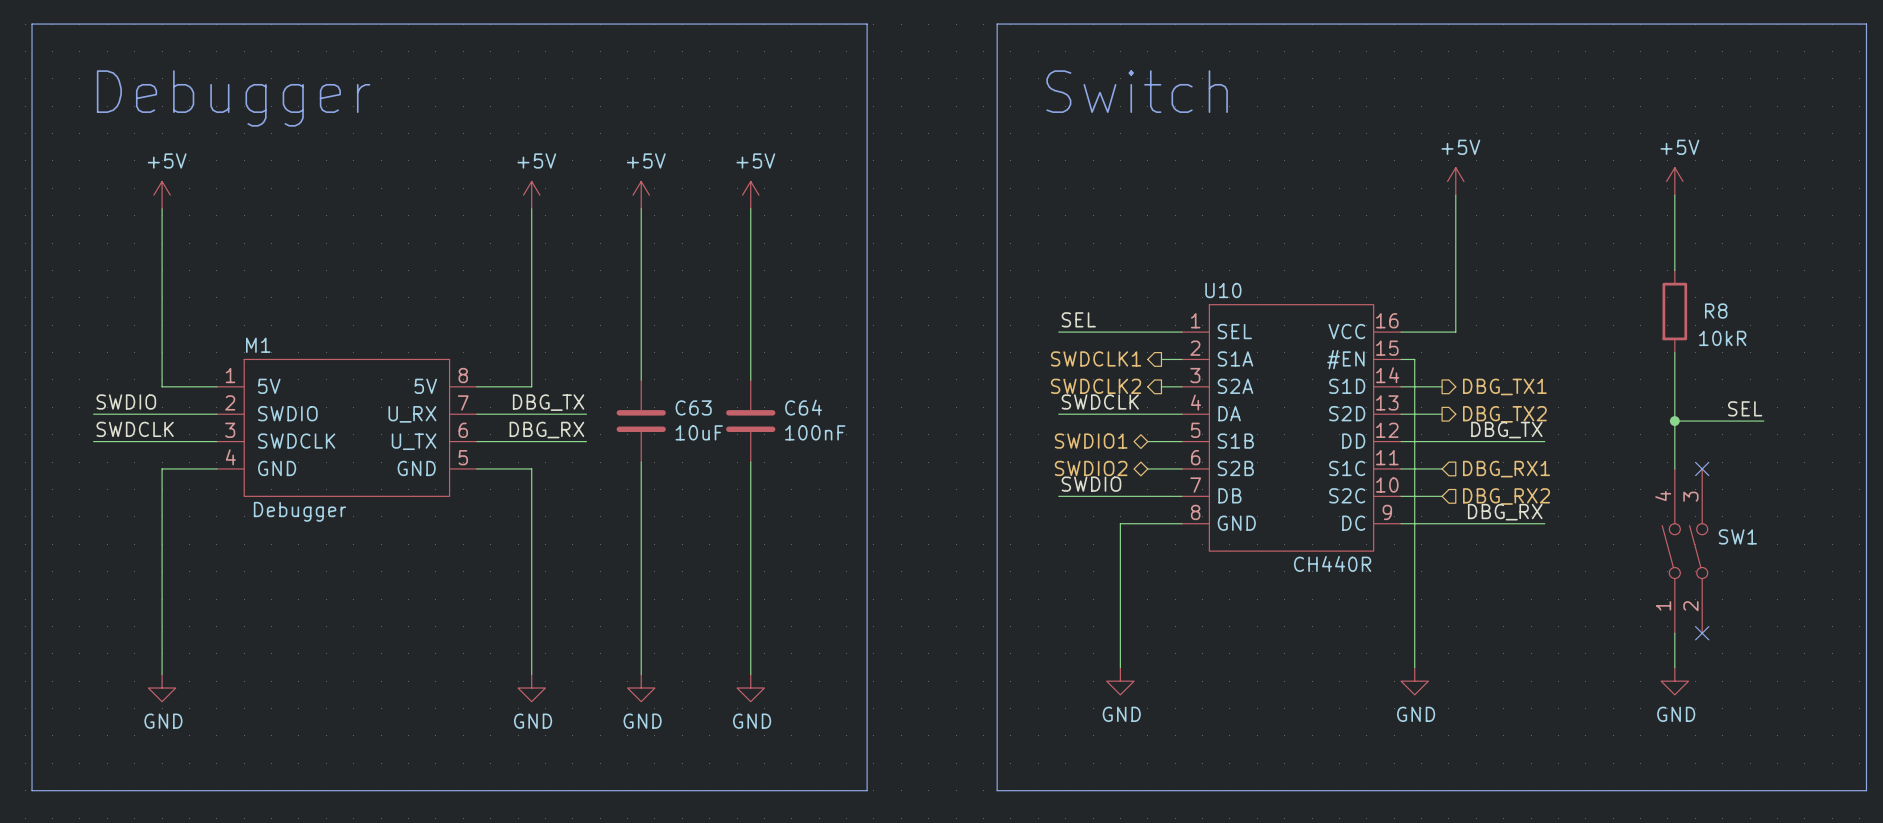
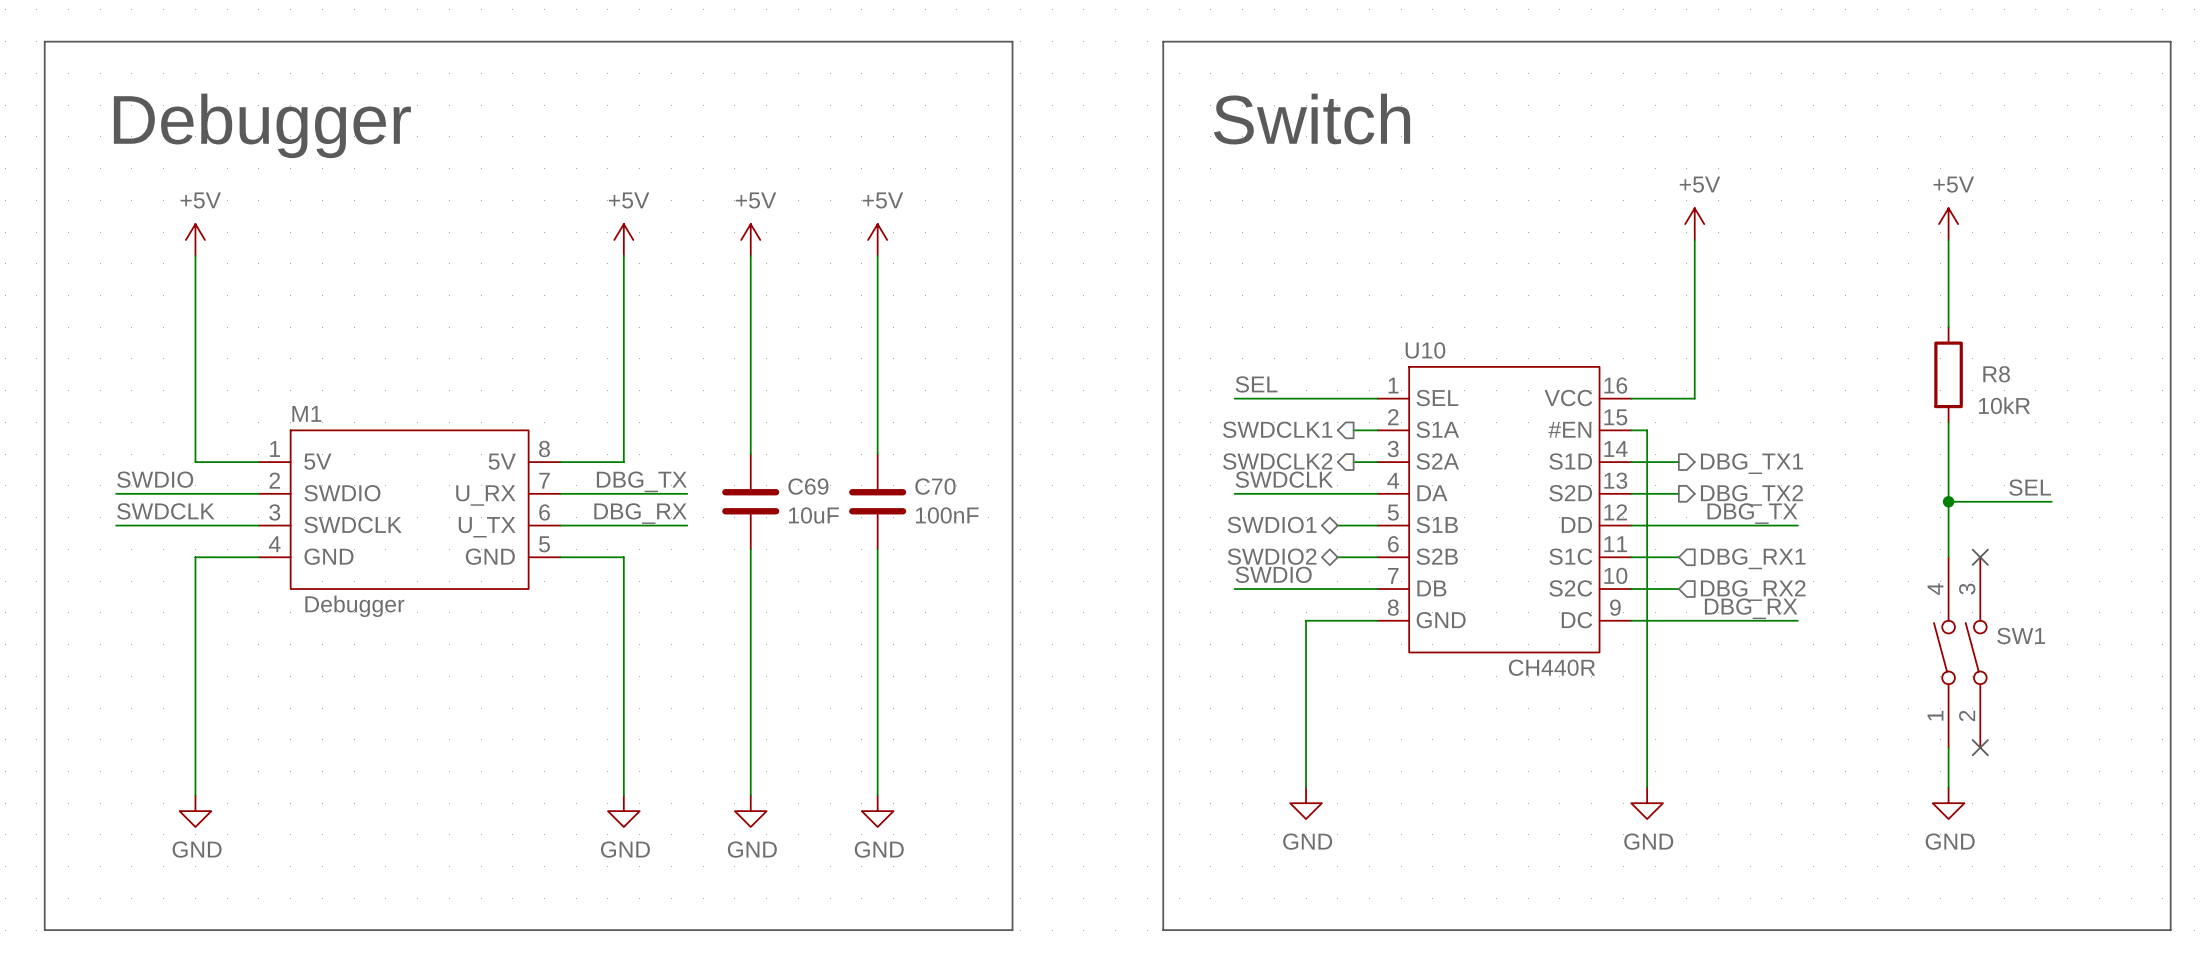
C63 name: C63 (693, 407) -> C69 (808, 486)
C64 name: C64 (803, 407) -> C70 (935, 486)

